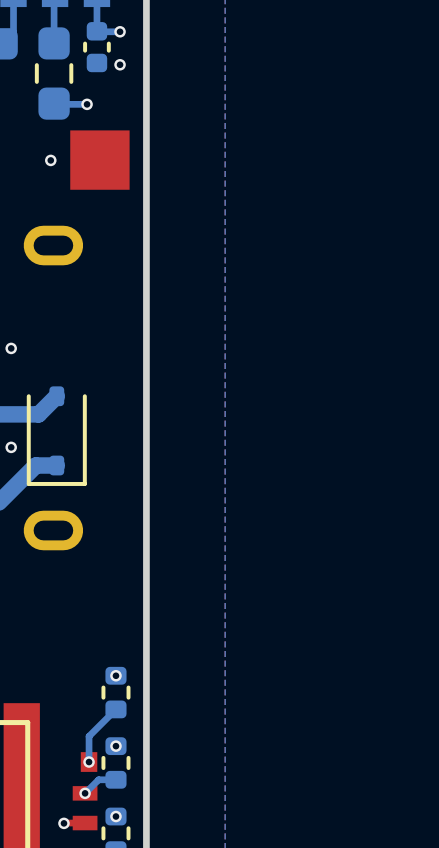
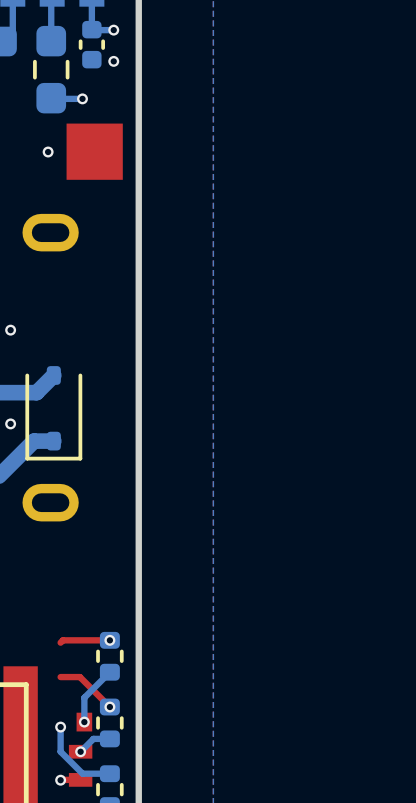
top track: none -> (109, 640) (62, 640) (60, 642)
top track: none -> (60, 677) (79, 677) (109, 707)
bottom track: none -> (60, 727) (60, 751) (82, 773) (109, 773)
via position: (115, 816) -> (60, 727)

